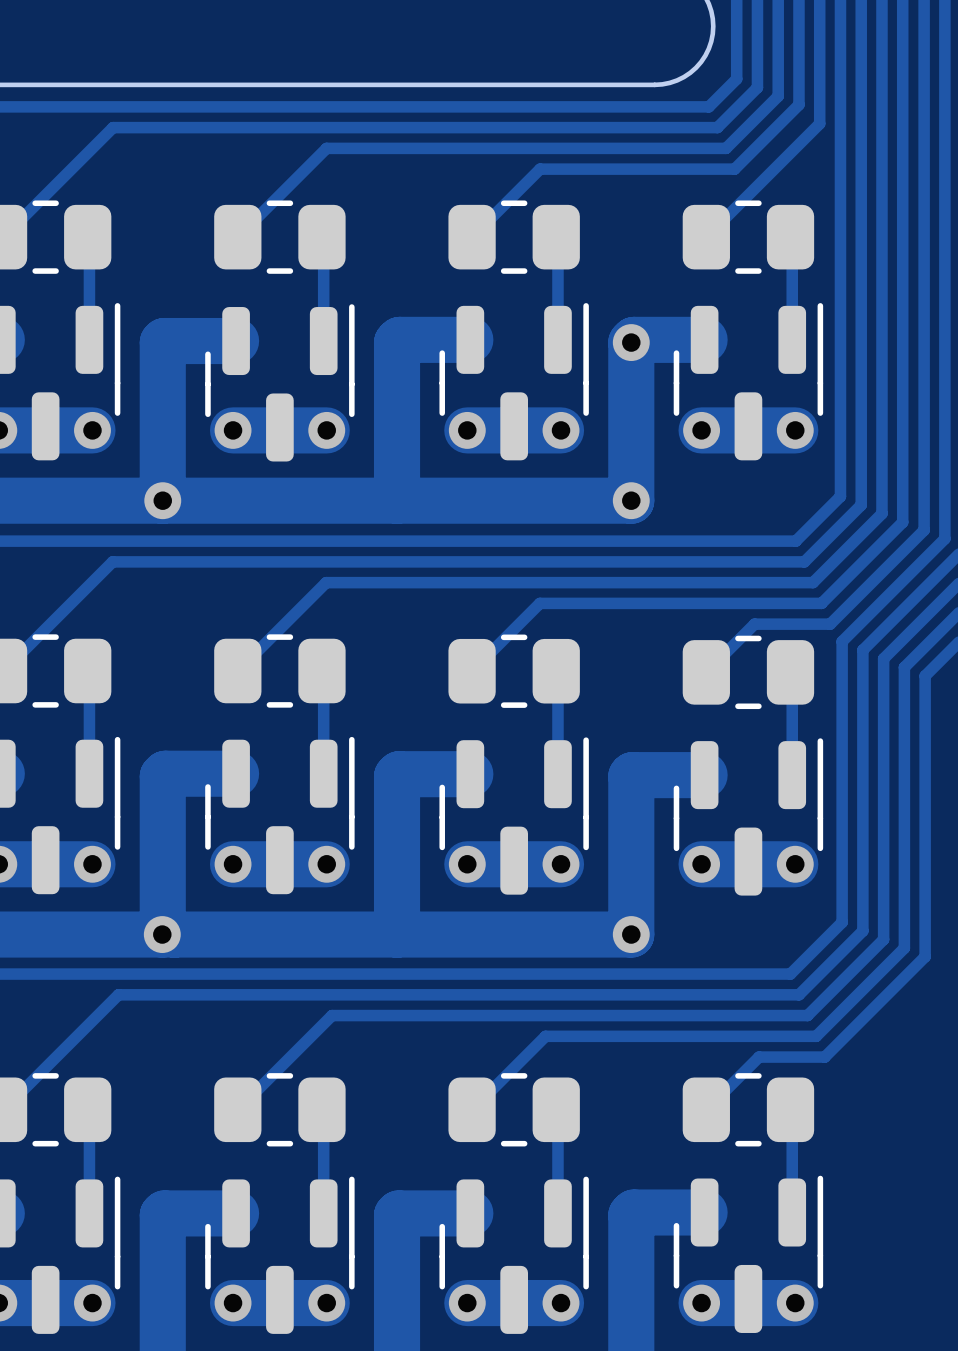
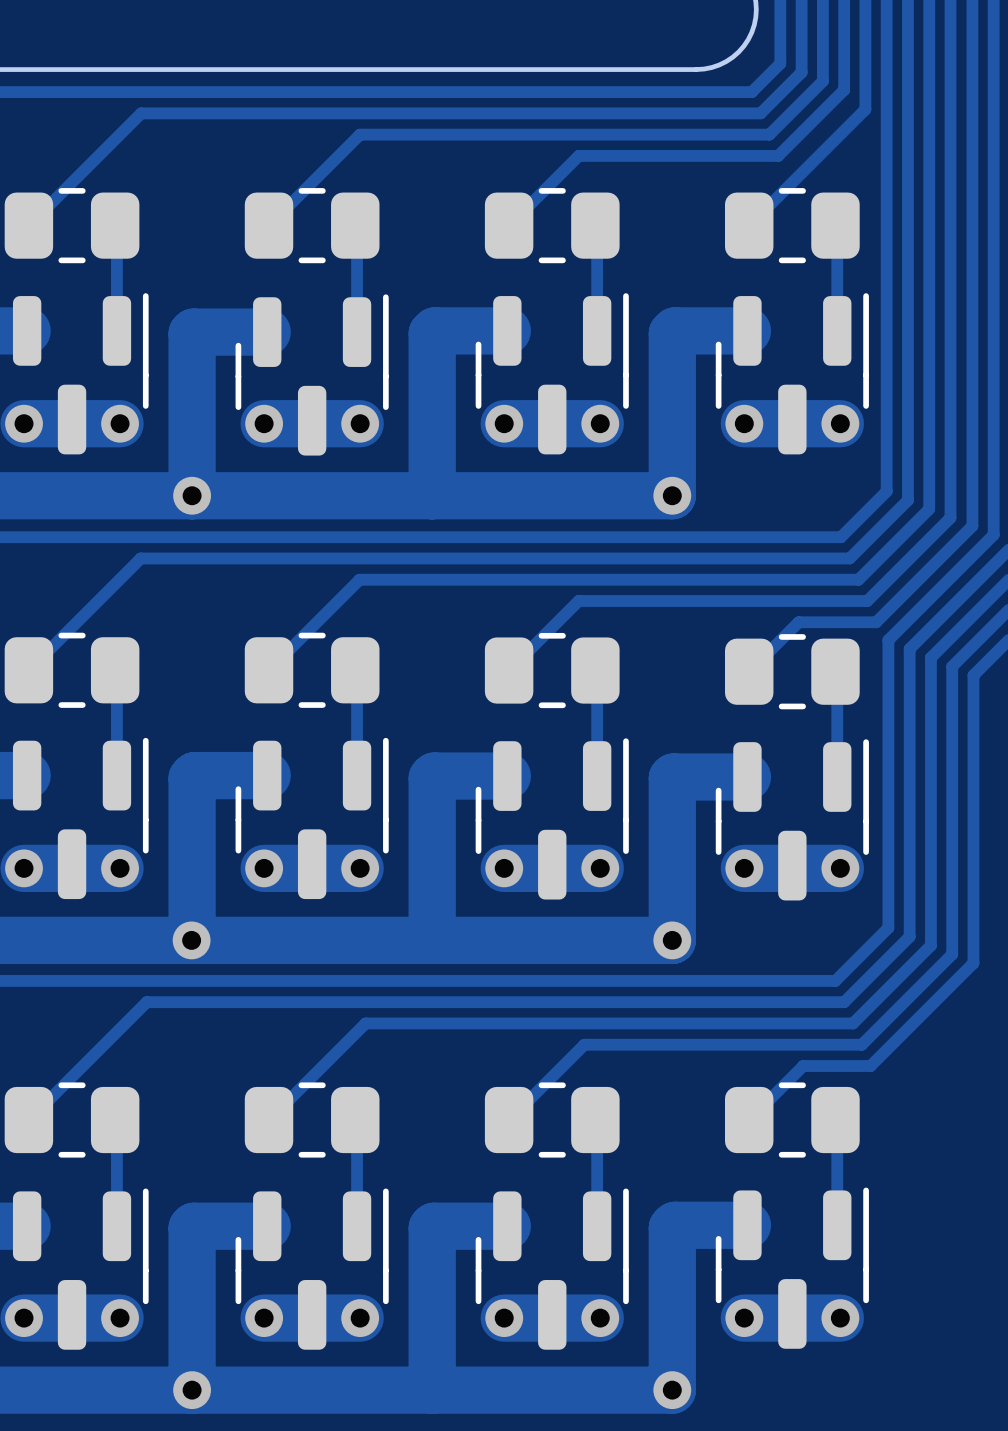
via: (631, 342) -> none

